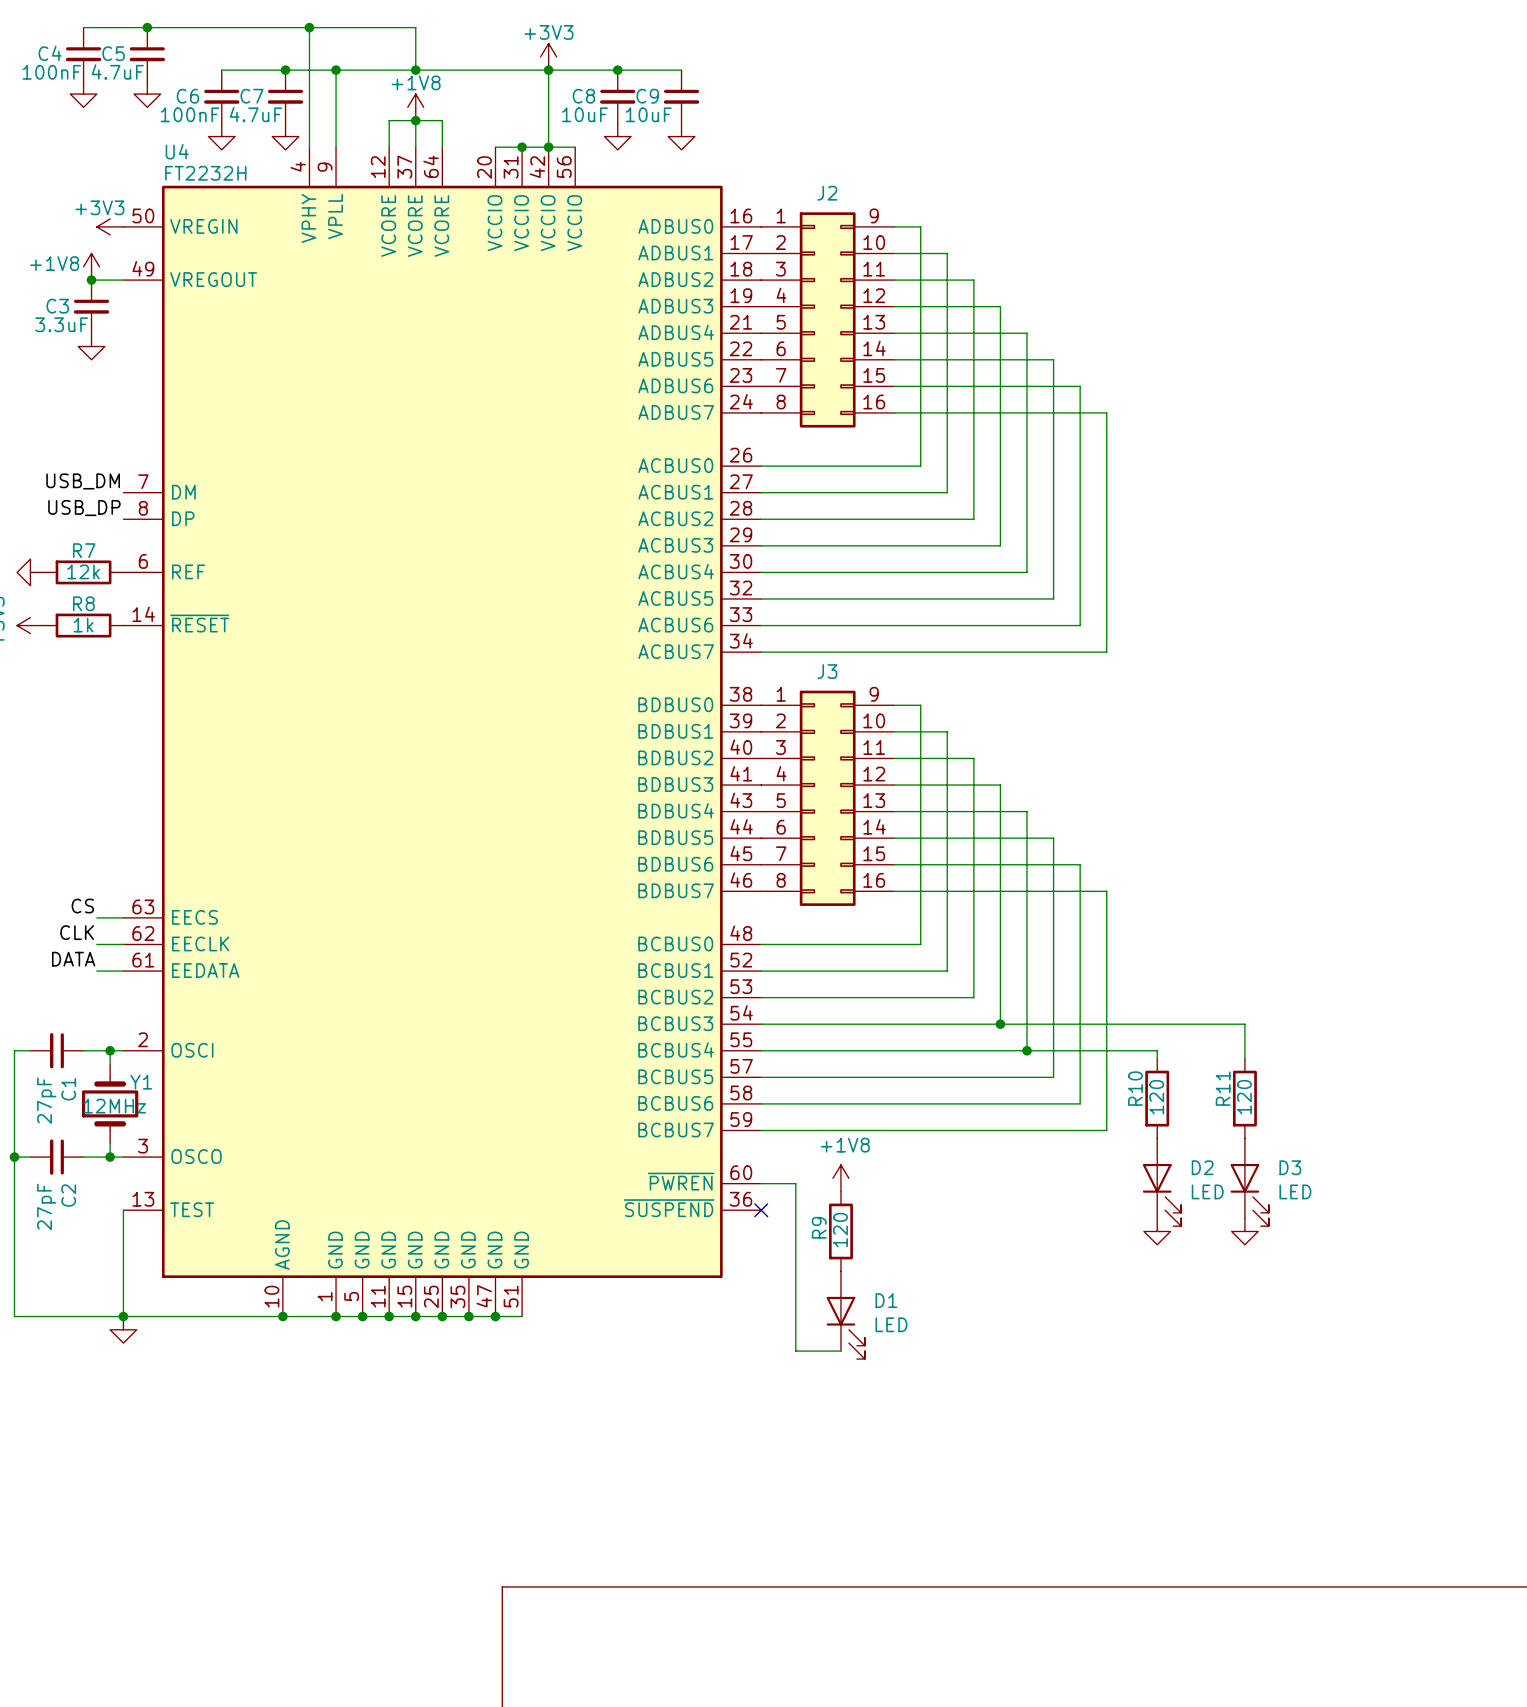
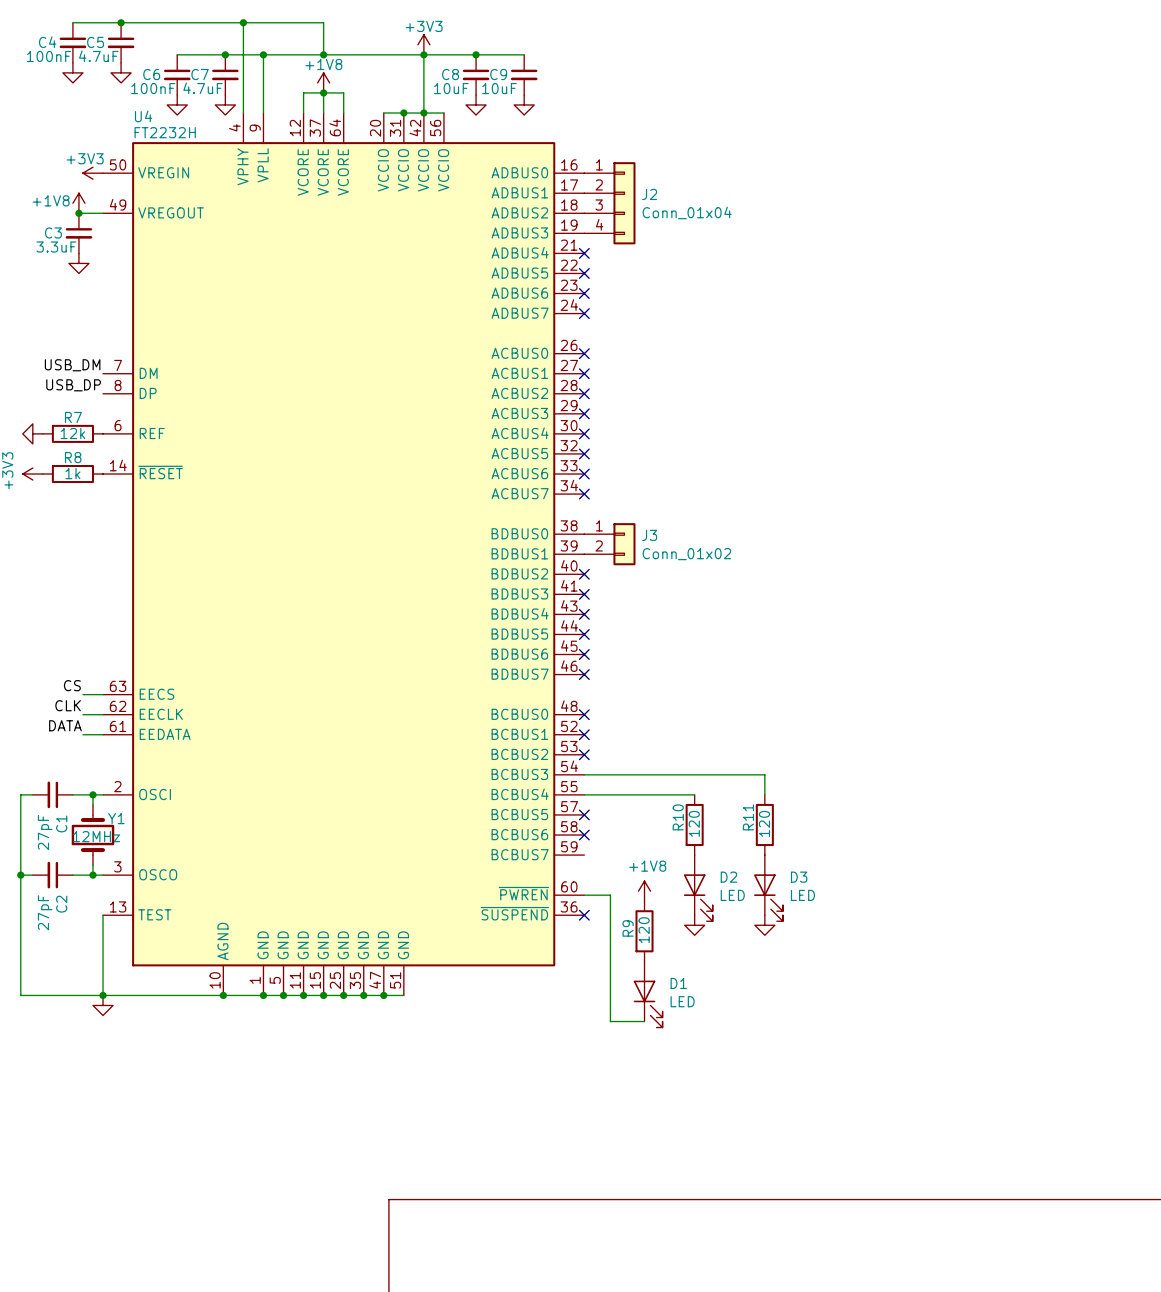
J2 name position: J2 (827, 193) -> J2 (649, 194)
J2 symbol: [761, 212, 895, 428] -> [584, 162, 636, 245]
wire: (894, 226) (920, 226) (920, 466) (761, 466) -> none
wire: (894, 253) (947, 253) (947, 492) (761, 492) -> none
J2 value: none -> Conn_01x04 (687, 212)
wire: (894, 280) (973, 280) (973, 519) (761, 519) -> none
wire: (894, 306) (1000, 306) (1000, 545) (761, 545) -> none
no-connect mark: none -> (584, 253)
wire: (894, 333) (1027, 333) (1027, 572) (761, 572) -> none
no-connect mark: none -> (584, 273)
wire: (894, 359) (1053, 359) (1053, 598) (761, 598) -> none
no-connect mark: none -> (584, 293)
wire: (894, 386) (1080, 386) (1080, 625) (761, 625) -> none
no-connect mark: none -> (584, 313)
wire: (894, 412) (1106, 412) (1106, 652) (761, 652) -> none
no-connect mark: none -> (584, 353)
no-connect mark: none -> (584, 373)
no-connect mark: none -> (584, 393)
no-connect mark: none -> (584, 413)
no-connect mark: none -> (584, 433)
no-connect mark: none -> (584, 453)
no-connect mark: none -> (584, 474)
no-connect mark: none -> (584, 494)
J3 name position: J3 (827, 671) -> J3 (649, 535)
J3 symbol: [761, 690, 895, 906] -> [584, 523, 636, 566]
wire: (894, 705) (920, 705) (920, 944) (761, 944) -> none
wire: (894, 731) (947, 731) (947, 971) (761, 971) -> none
J3 value: none -> Conn_01x02 (686, 554)
no-connect mark: none -> (584, 574)
wire: (894, 758) (973, 758) (973, 997) (761, 997) -> none
no-connect mark: none -> (584, 594)
wire: (894, 785) (1000, 785) (1000, 1024) (1244, 1024) (1244, 1058) -> none
no-connect mark: none -> (584, 614)
wire: (894, 811) (1027, 811) (1027, 1050) -> none
no-connect mark: none -> (584, 634)
wire: (894, 838) (1053, 838) (1053, 1077) (761, 1077) -> none
no-connect mark: none -> (584, 654)
wire: (894, 864) (1080, 864) (1080, 1103) (761, 1103) -> none
no-connect mark: none -> (584, 674)
wire: (894, 891) (1106, 891) (1106, 1130) (761, 1130) -> none
no-connect mark: none -> (584, 714)
no-connect mark: none -> (584, 734)
no-connect mark: none -> (584, 754)
wire: none -> (764, 774) (764, 794)
junction: (1000, 1024) -> none
wire: (907, 1050) (1157, 1050) (1157, 1058) -> none
junction: (1027, 1050) -> none
no-connect mark: none -> (584, 814)
R10 position: (1157, 1098) -> (694, 824)
R11 position: (1244, 1098) -> (764, 824)
no-connect mark: none -> (584, 835)
D2 position: (1162, 1182) -> (698, 888)
D3 position: (1249, 1182) -> (768, 888)
power symbol: none -> (694, 925)
power symbol: none -> (764, 925)
power symbol: (1157, 1231) -> none
power symbol: (1244, 1231) -> none

